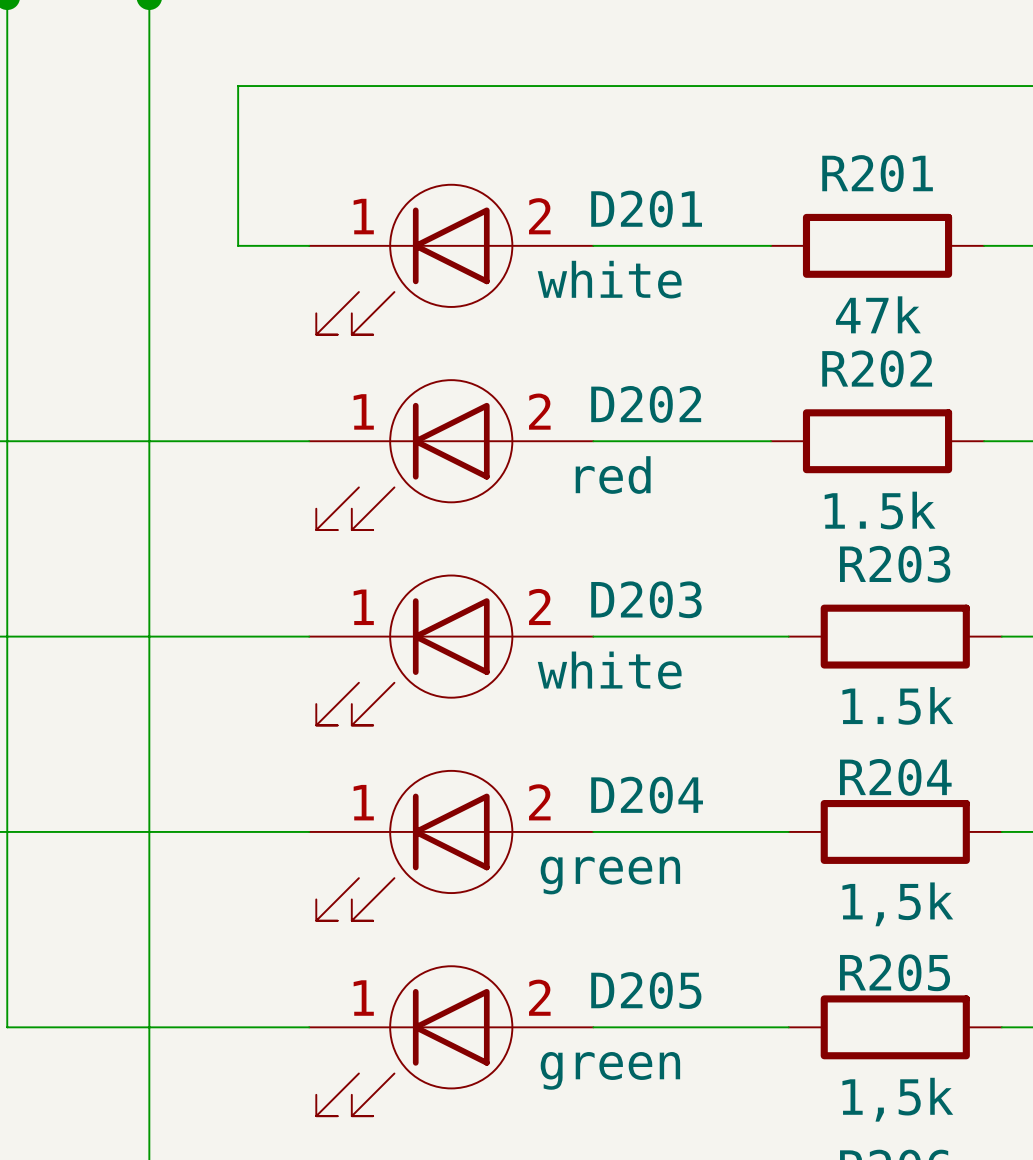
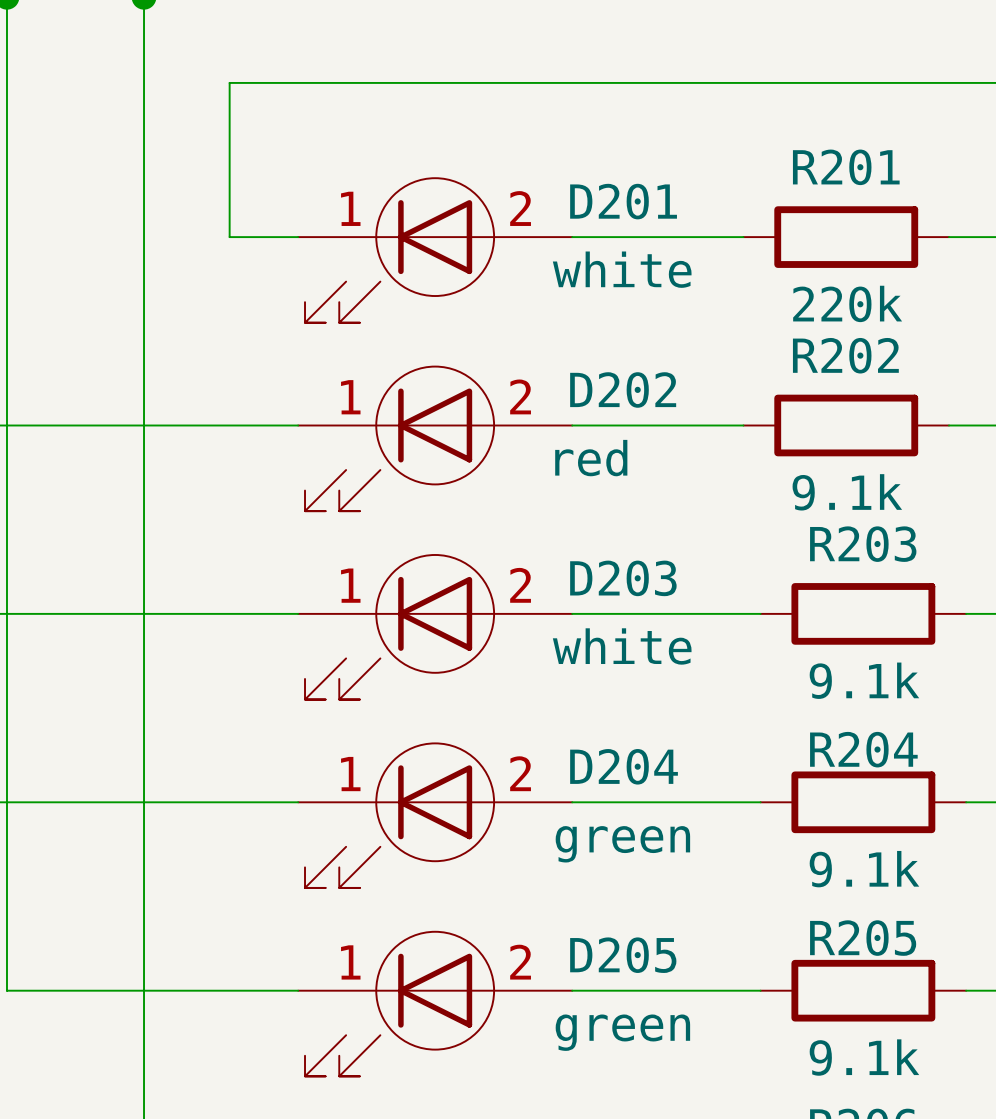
D201 value position: white (609, 279) -> white (622, 269)
R201 value: 47k (878, 314) -> 220k (847, 303)
R202 value: 1.5k (880, 510) -> 9.1k (847, 492)
D203 value position: white (609, 670) -> white (622, 646)
R203 value: 1.5k (897, 705) -> 9.1k (864, 680)
D204 value position: green (610, 875) -> green (622, 844)
R204 value: 1,5k (897, 904) -> 9.1k (864, 869)
D205 value position: green (610, 1070) -> green (622, 1032)
R205 value: 1,5k (897, 1099) -> 9.1k (864, 1057)

